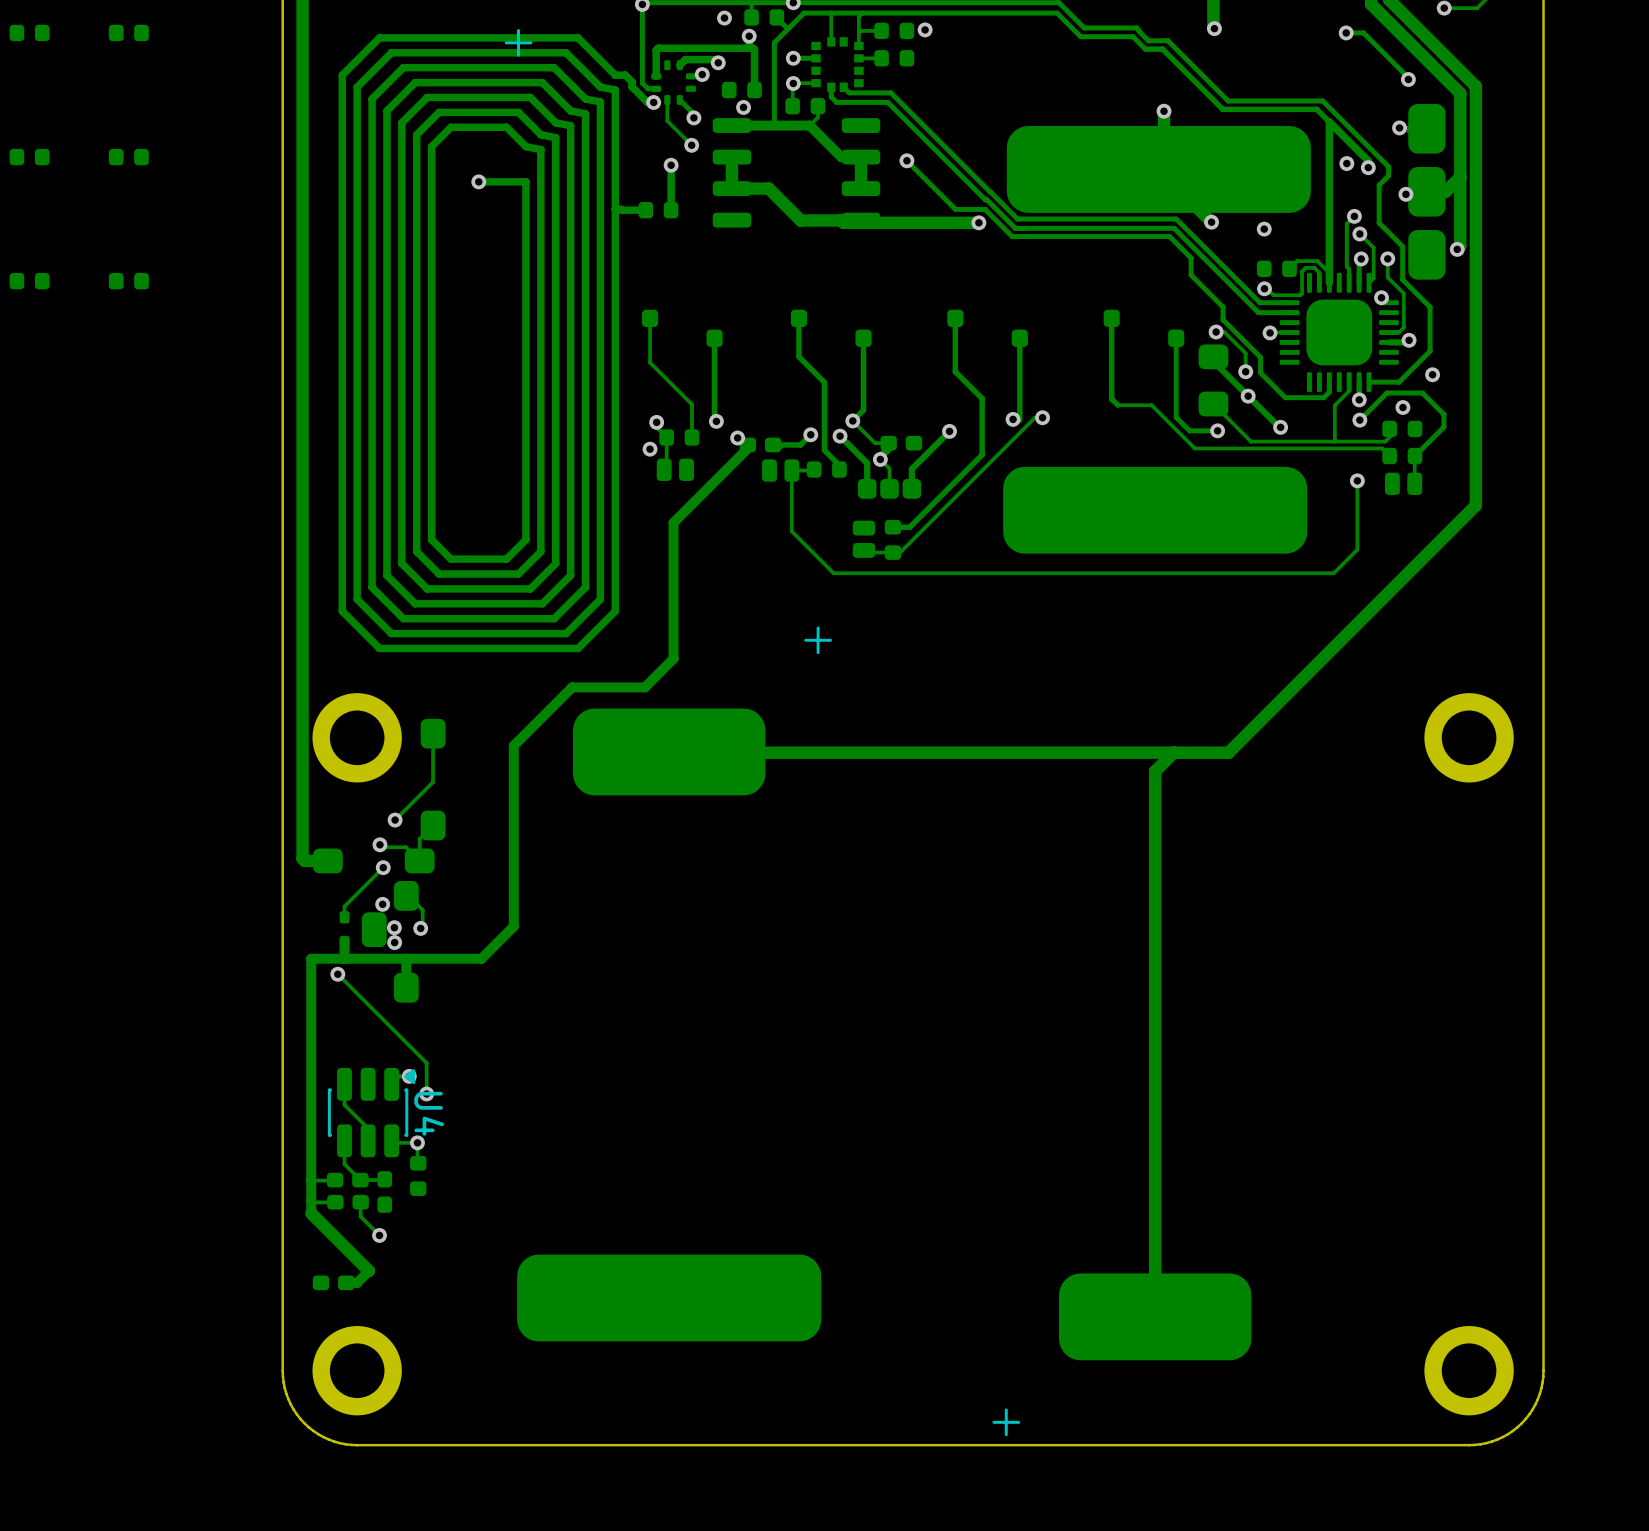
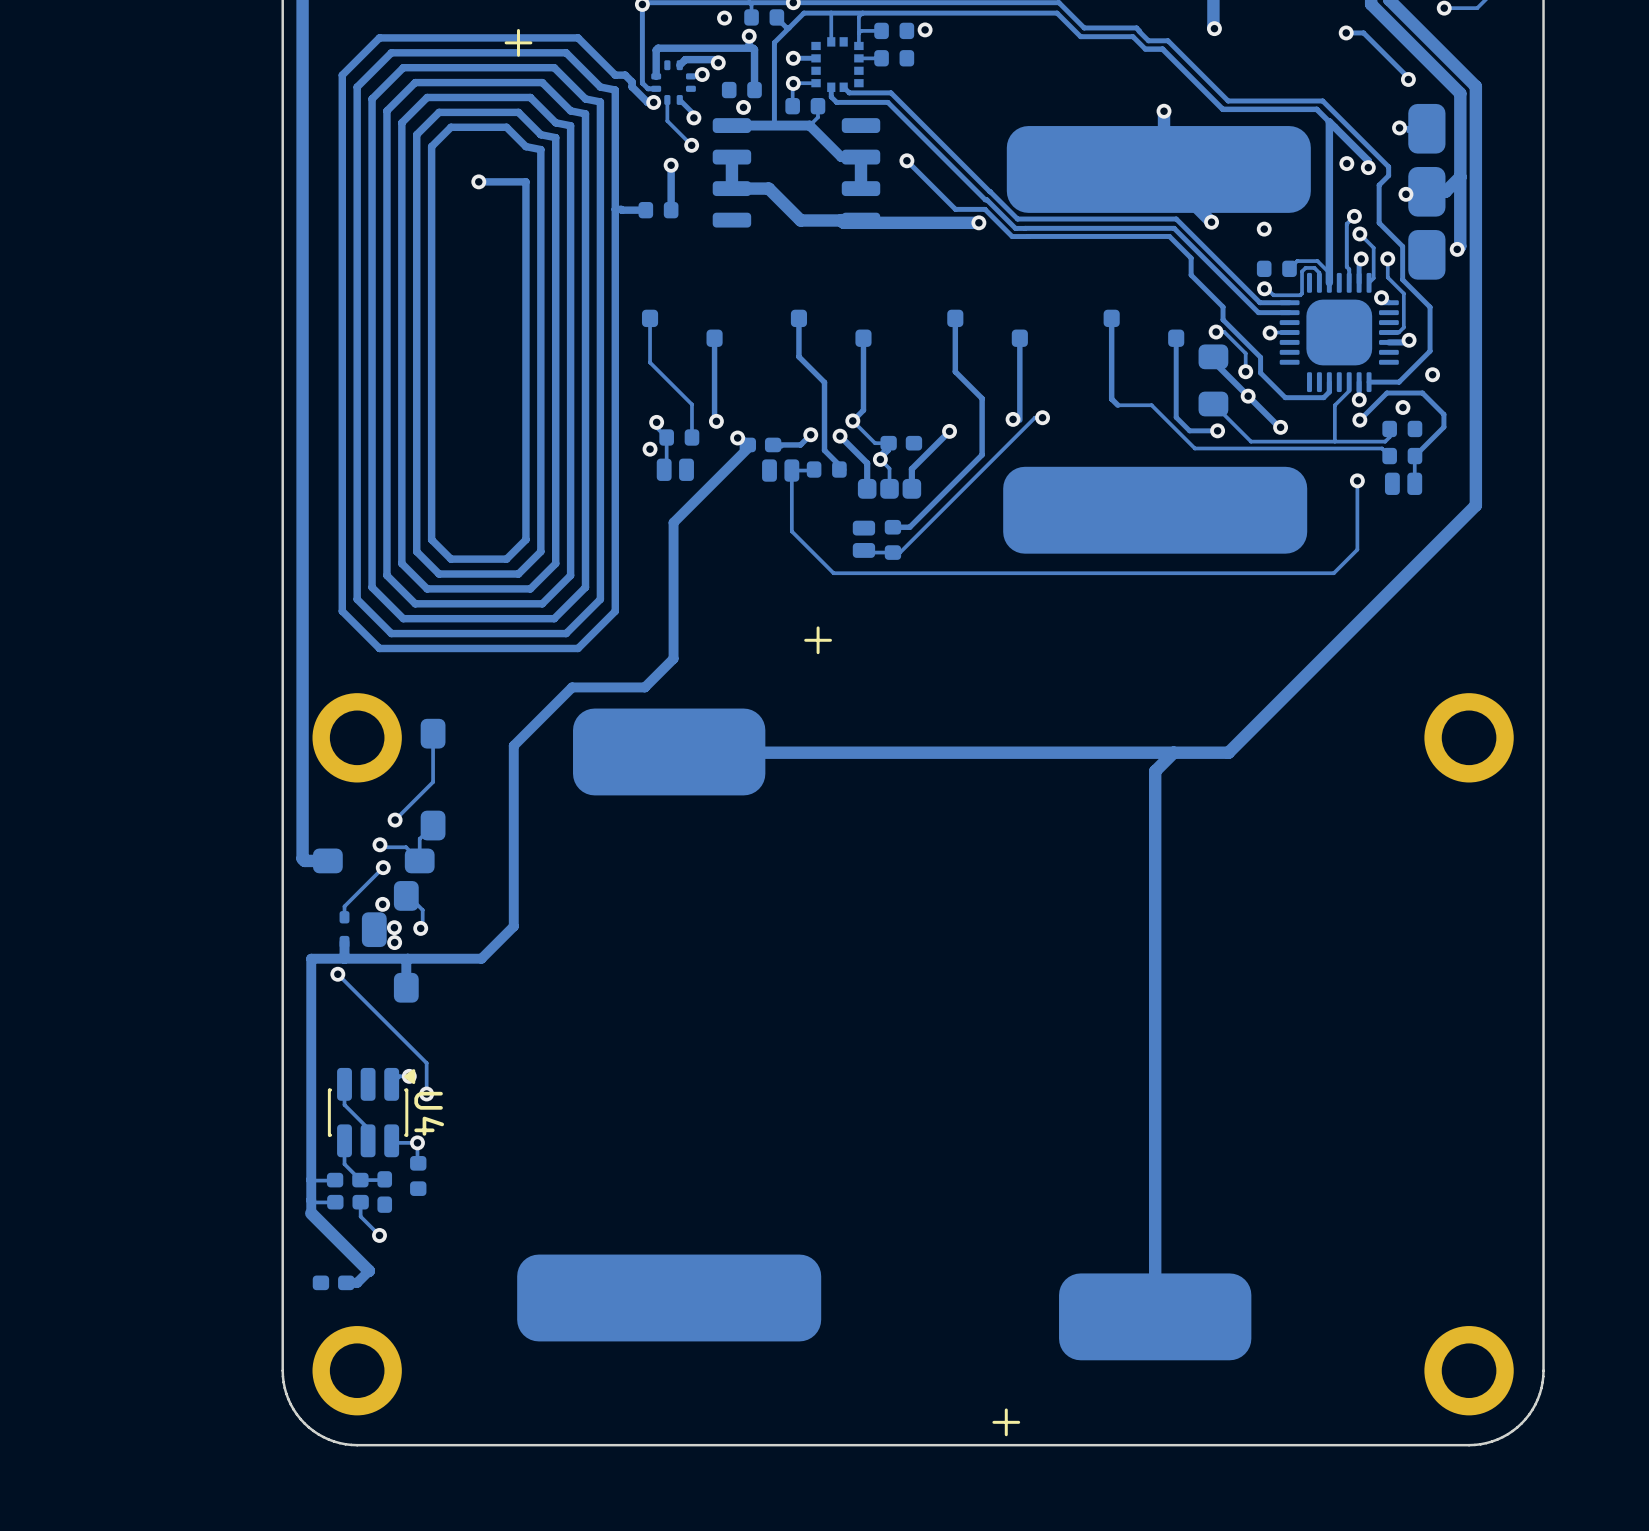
part: (29, 32) -> none
part: (128, 32) -> none
part: (29, 157) -> none
part: (128, 157) -> none
part: (29, 281) -> none
part: (128, 281) -> none

